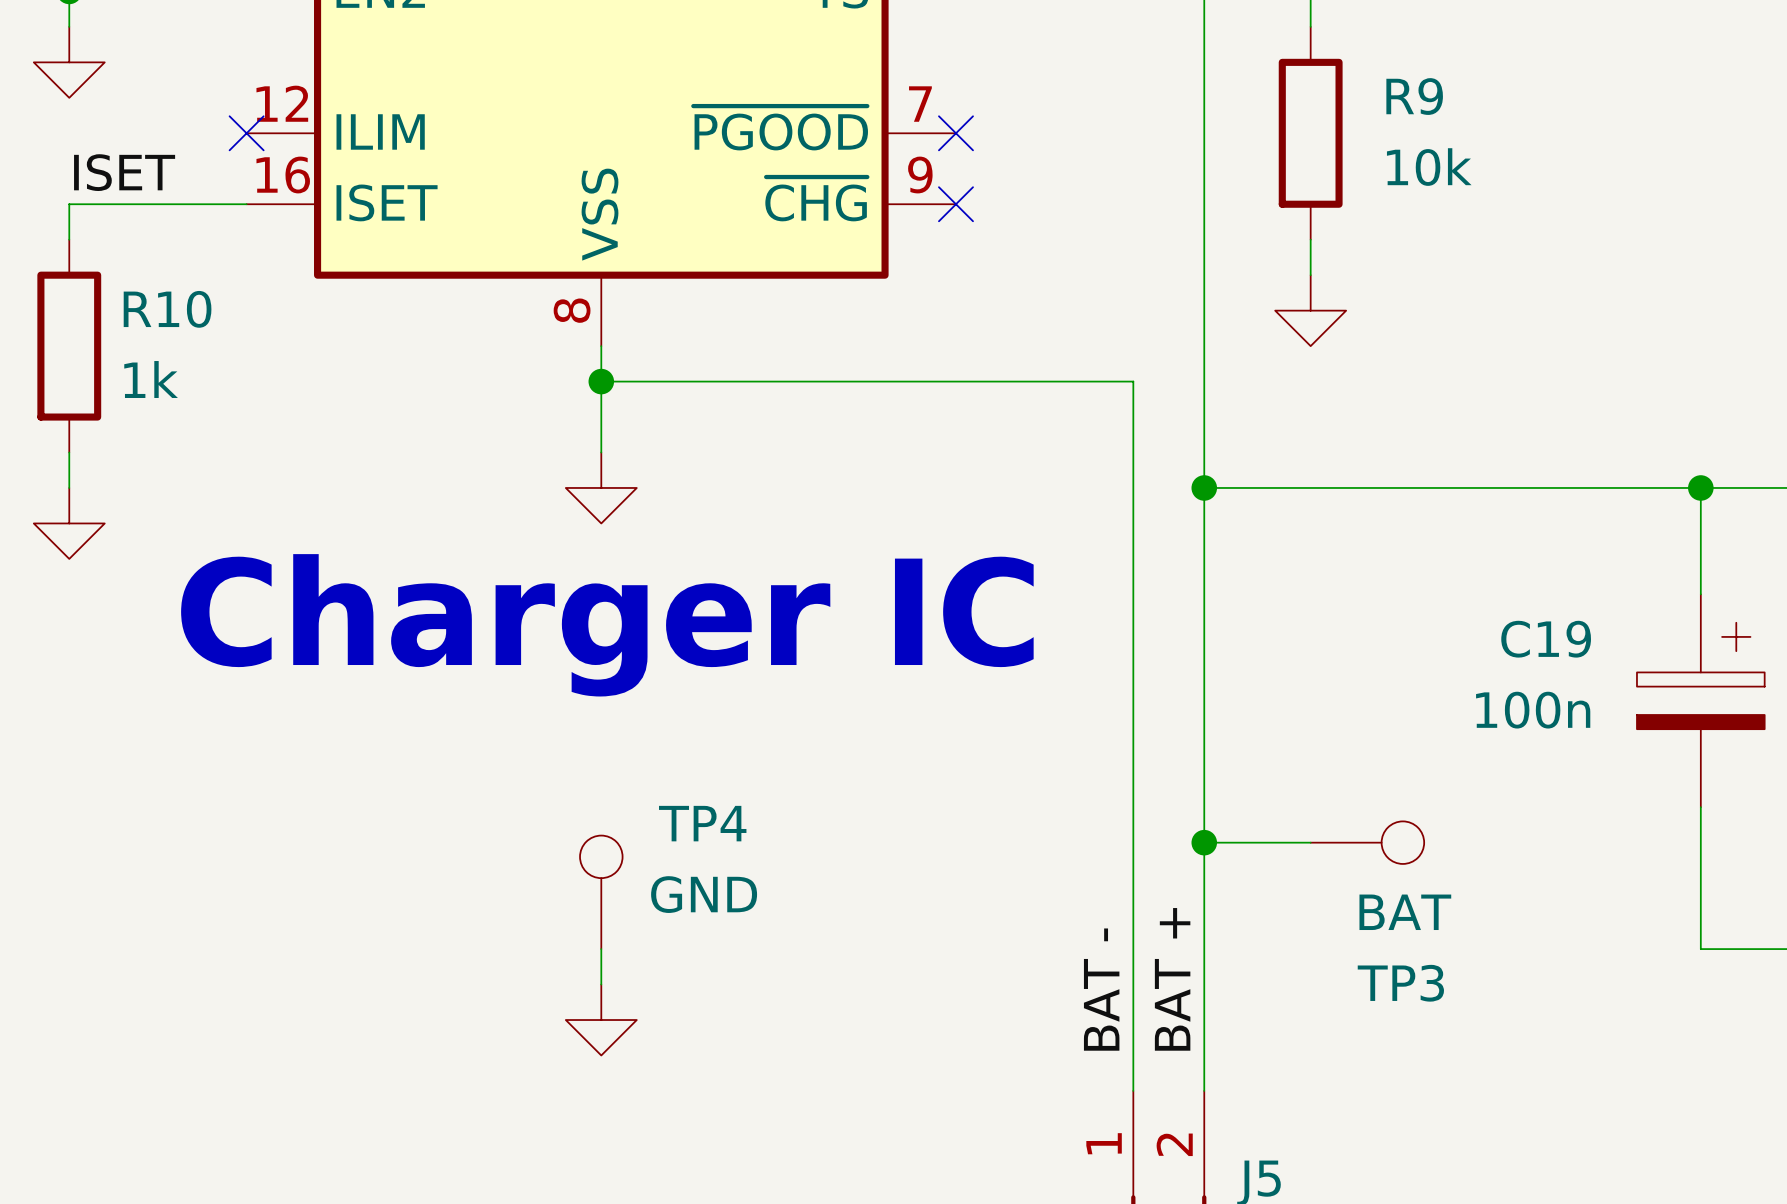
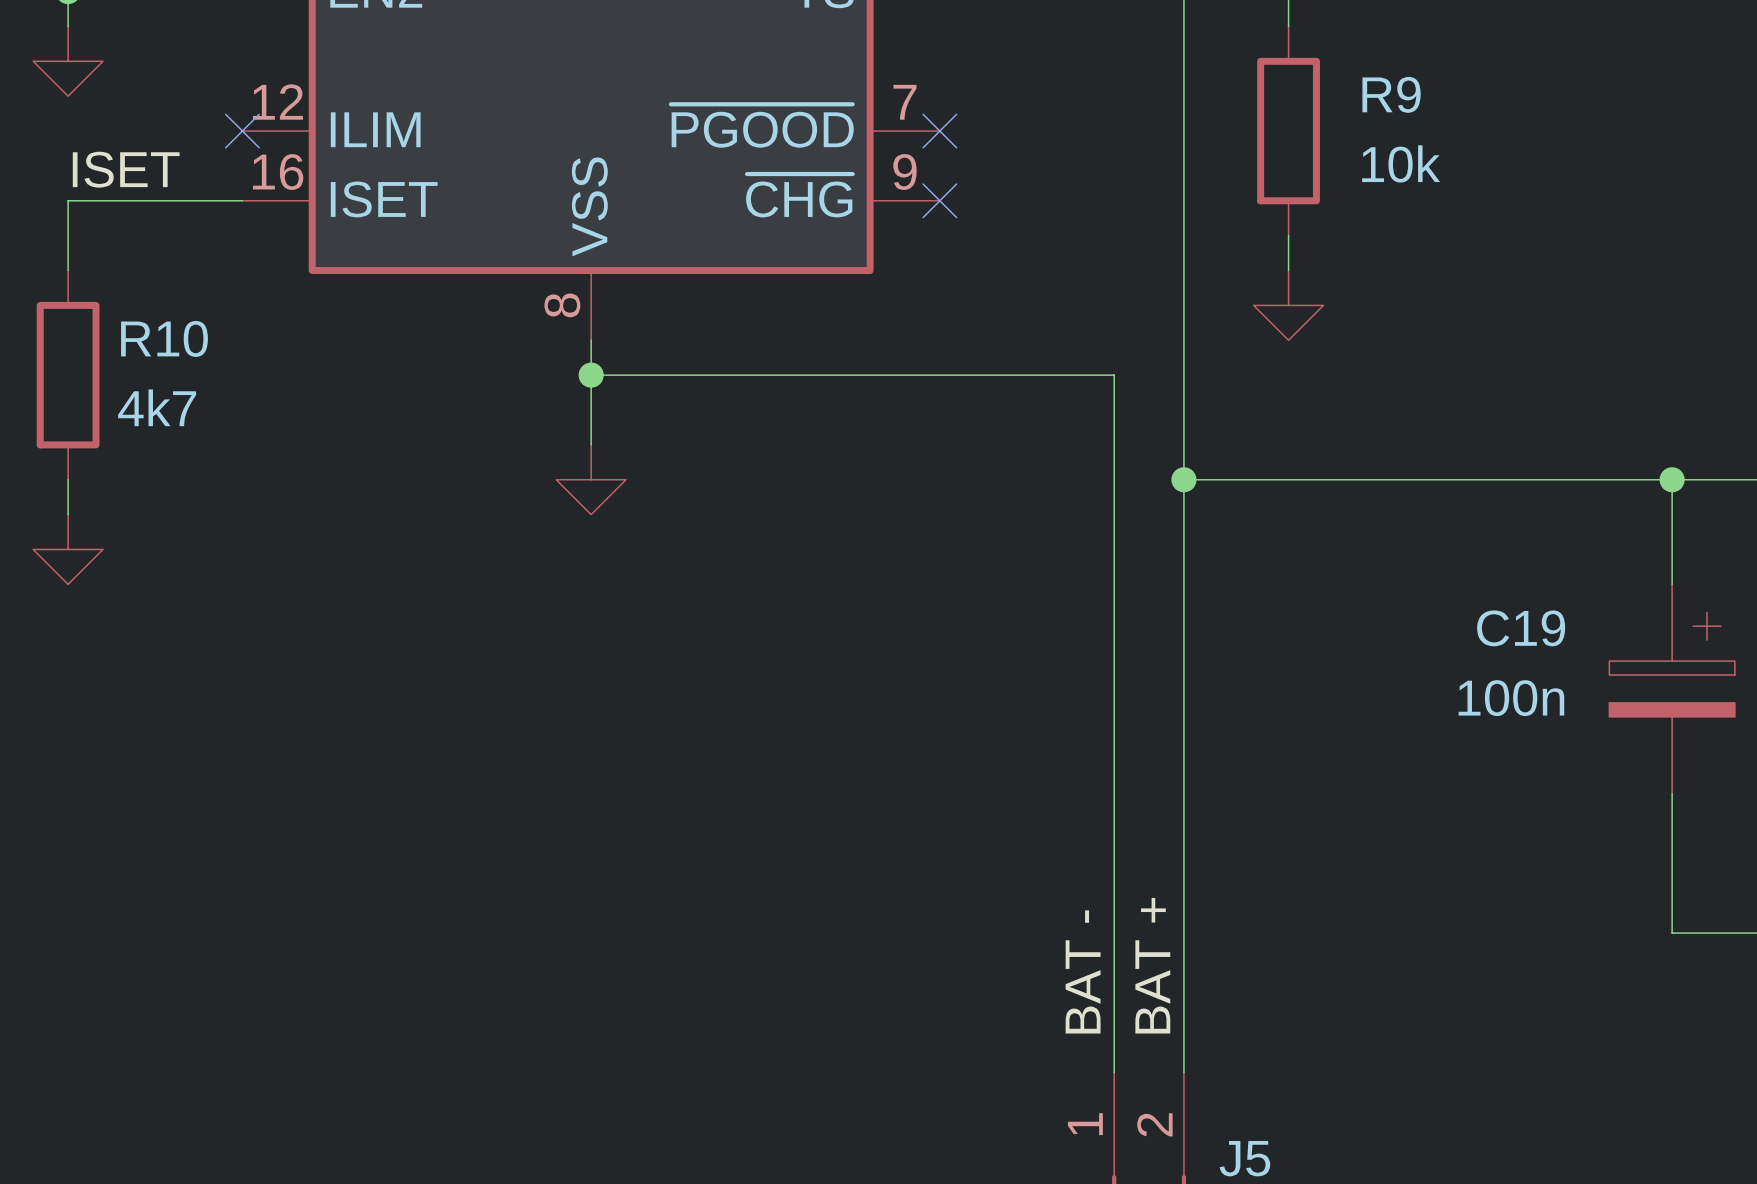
R10 position: (69, 346) -> (68, 375)
R10 value: 1k (151, 379) -> 4k7 (157, 407)
power symbol position: (69, 523) -> (68, 549)
text: Charger IC (607, 625) -> none
wire: (1204, 842) (1310, 842) -> none
junction: (1204, 842) -> none
TP3: BAT (1367, 842) -> none
TP4: GND (601, 892) -> none
wire: (601, 949) (601, 984) -> none
power symbol: (601, 1020) -> none

